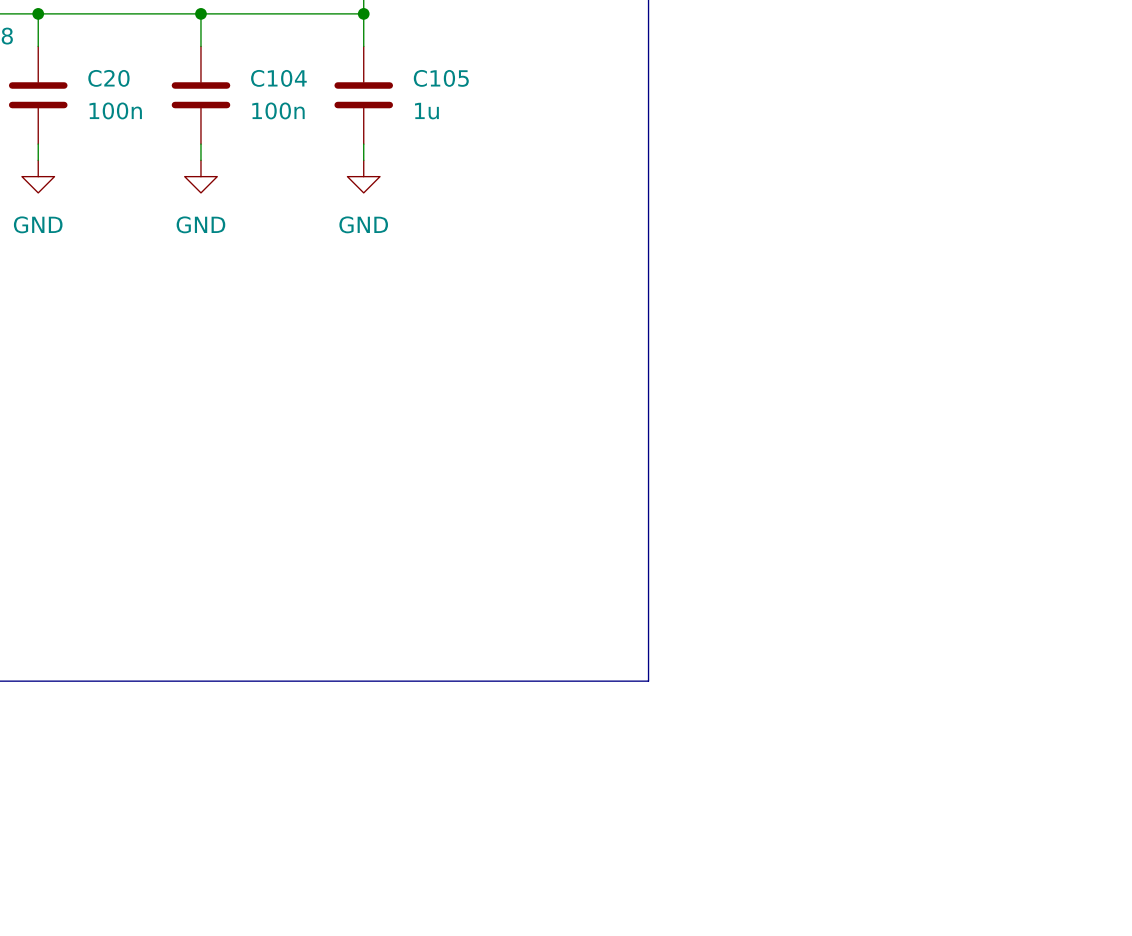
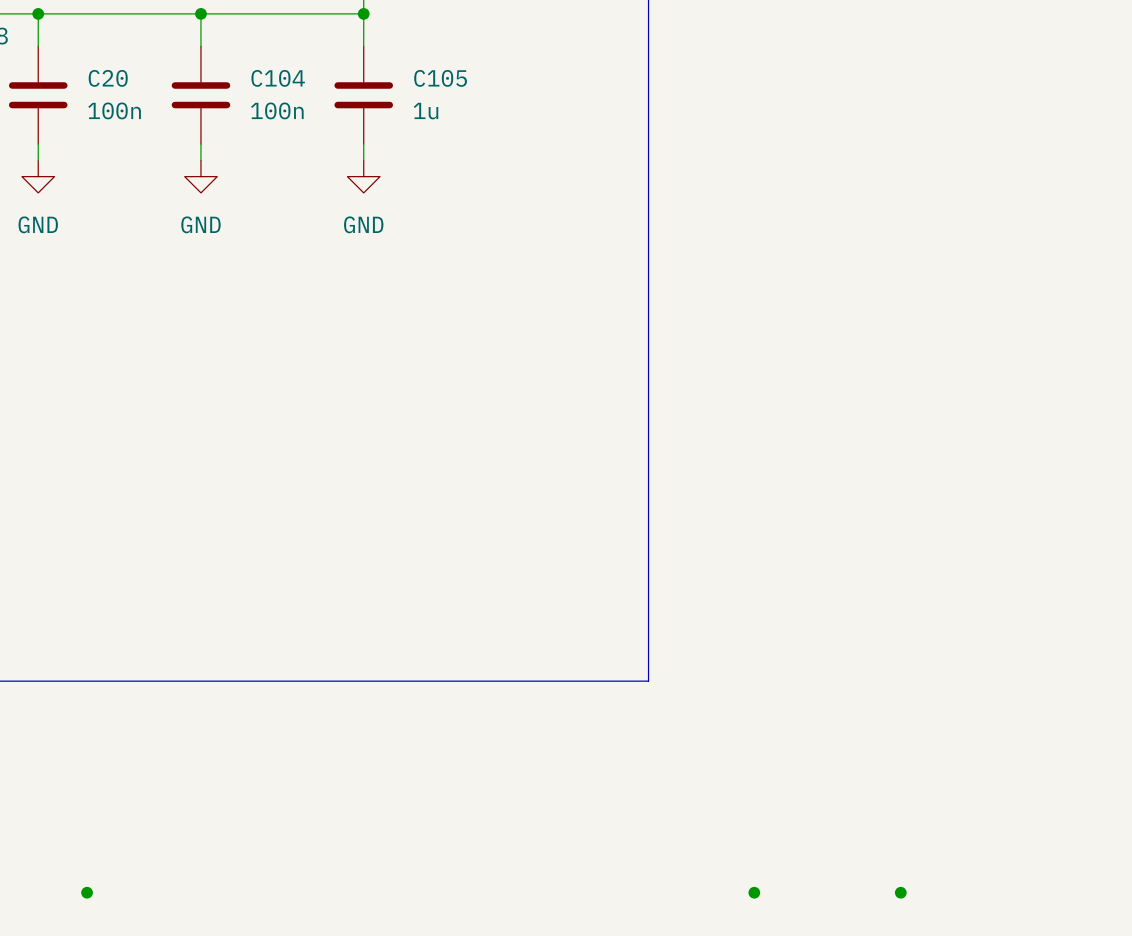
junction: none -> (87, 892)
junction: none -> (754, 892)
junction: none -> (900, 892)

